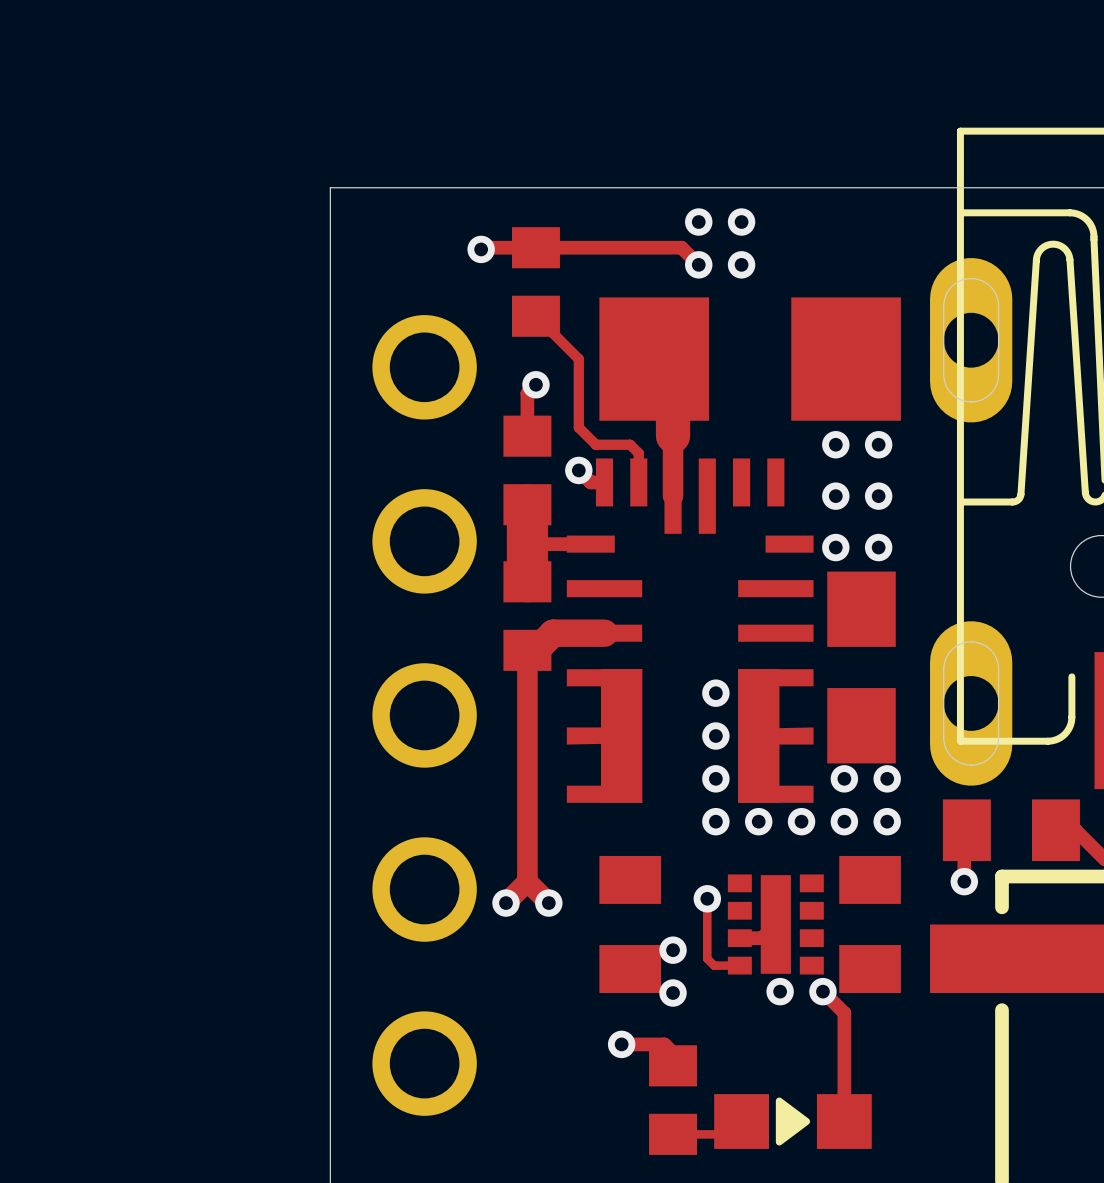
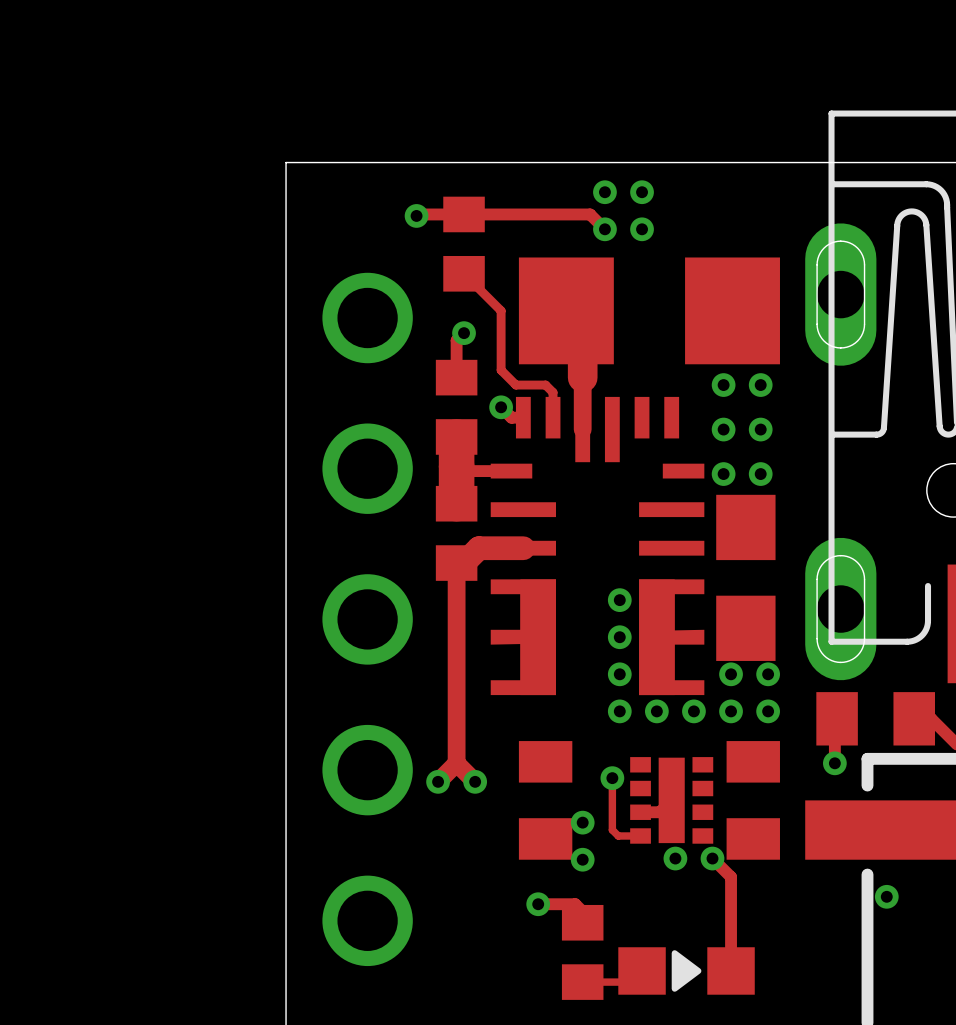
via: none -> (886, 896)

